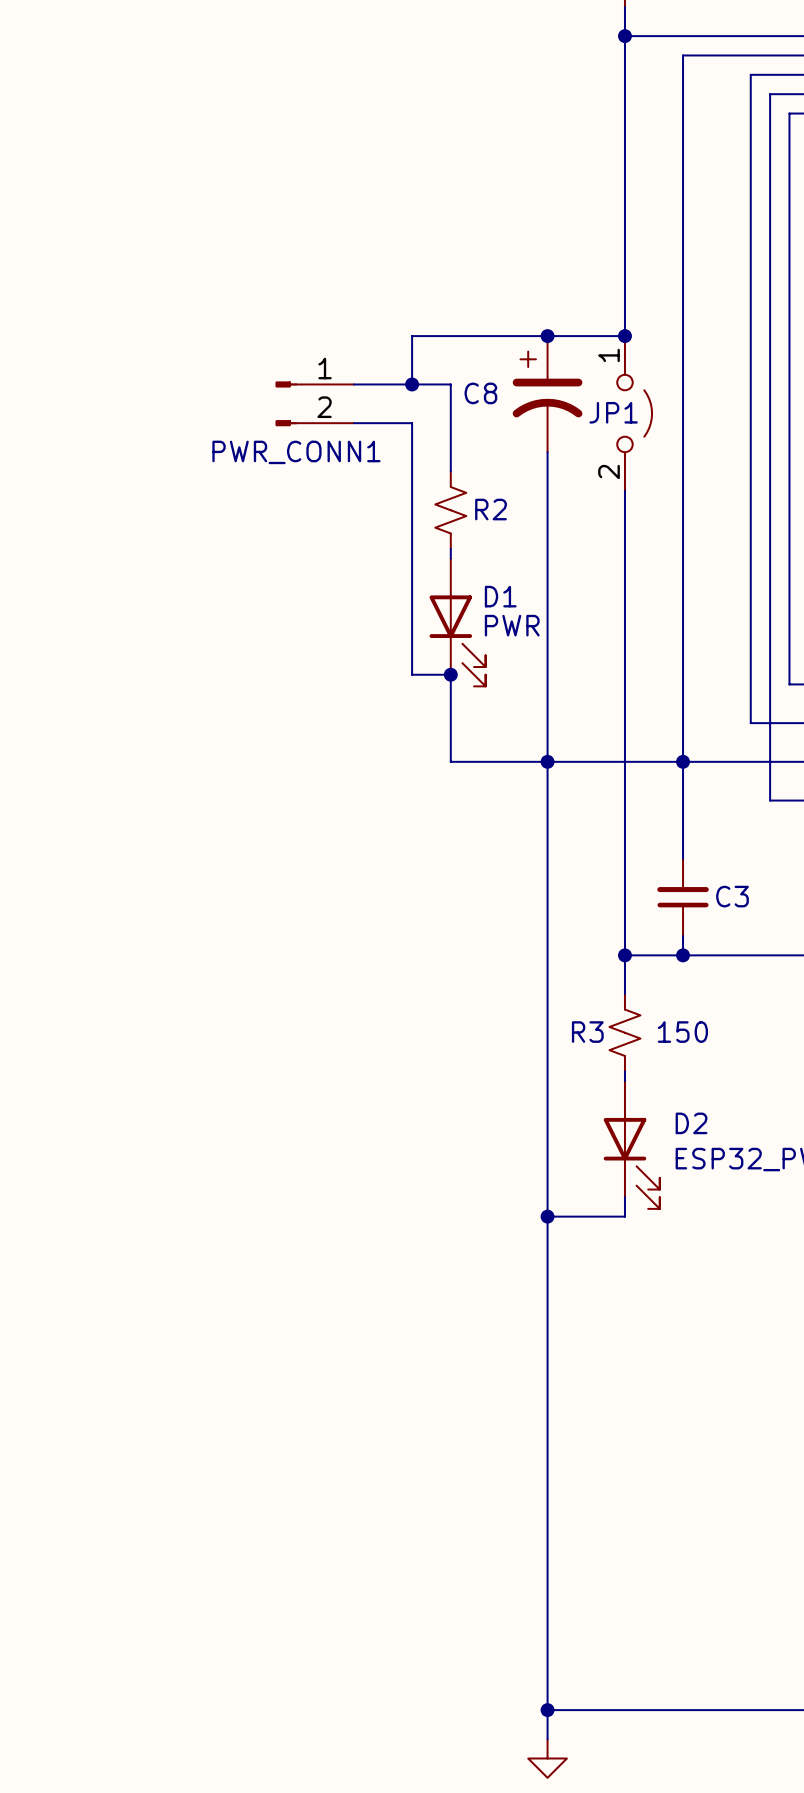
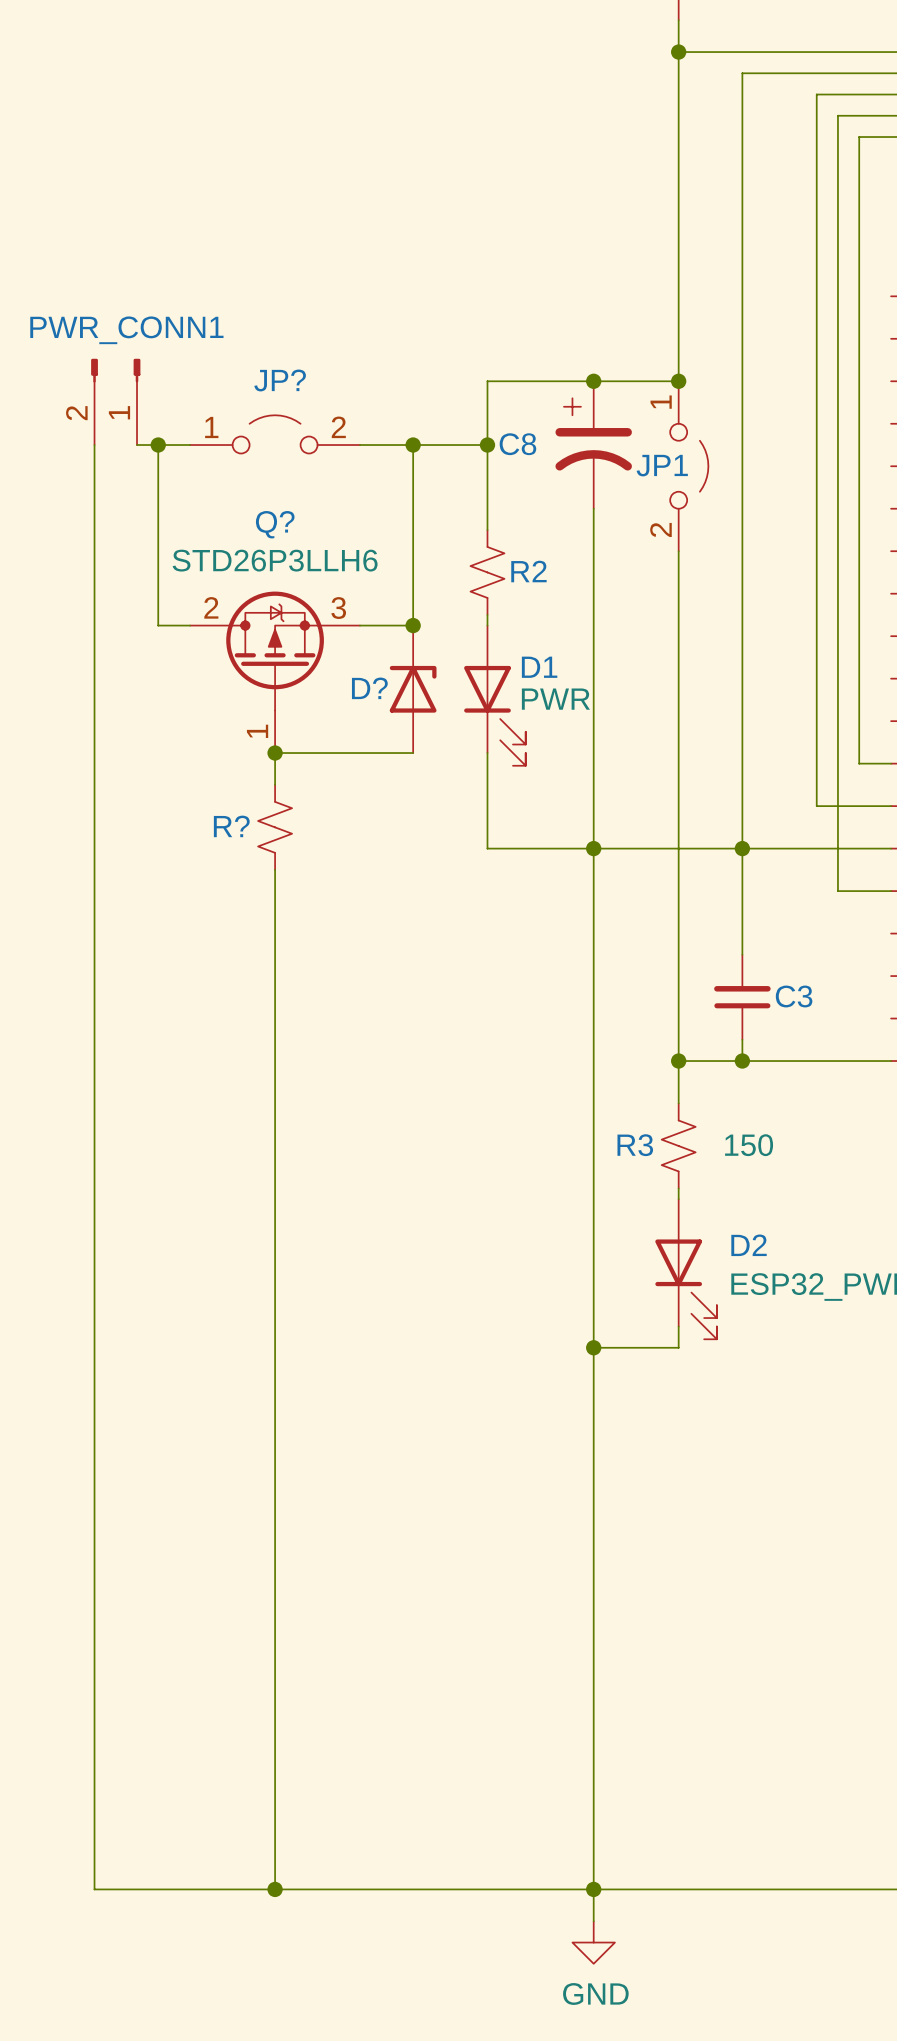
wire: (450, 336) (412, 336) (412, 384) -> (487, 381) (487, 434)
JP?: none -> (275, 434)
wire: (354, 384) (450, 384) -> none
junction: (412, 384) -> none
wire: none -> (94, 445) (94, 1889) (593, 1889)
wire: none -> (137, 445) (190, 445)
wire: none -> (158, 445) (158, 625) (190, 625)
junction: none -> (158, 445)
wire: none -> (360, 445) (487, 445)
wire: none -> (413, 445) (413, 625) (360, 625)
junction: none -> (413, 445)
junction: none -> (487, 445)
PWR_CONN1 rotation: 0° (286, 403) -> 90° clockwise (115, 370)
PWR_CONN1 position: (314, 403) -> (115, 401)
wire: (354, 423) (412, 423) (412, 674) (450, 674) -> none
PWR_CONN1 name position: PWR_CONN1 (296, 452) -> PWR_CONN1 (126, 330)
junction: none -> (413, 625)
Q?: none -> STD26P3LLH6 (275, 672)
D?: none -> (413, 689)
junction: none -> (275, 753)
wire: none -> (413, 753) (275, 753) (275, 784)
junction: (450, 674) -> none
R?: none -> (275, 827)
wire: none -> (275, 869) (275, 1889)
junction: none -> (275, 1889)

